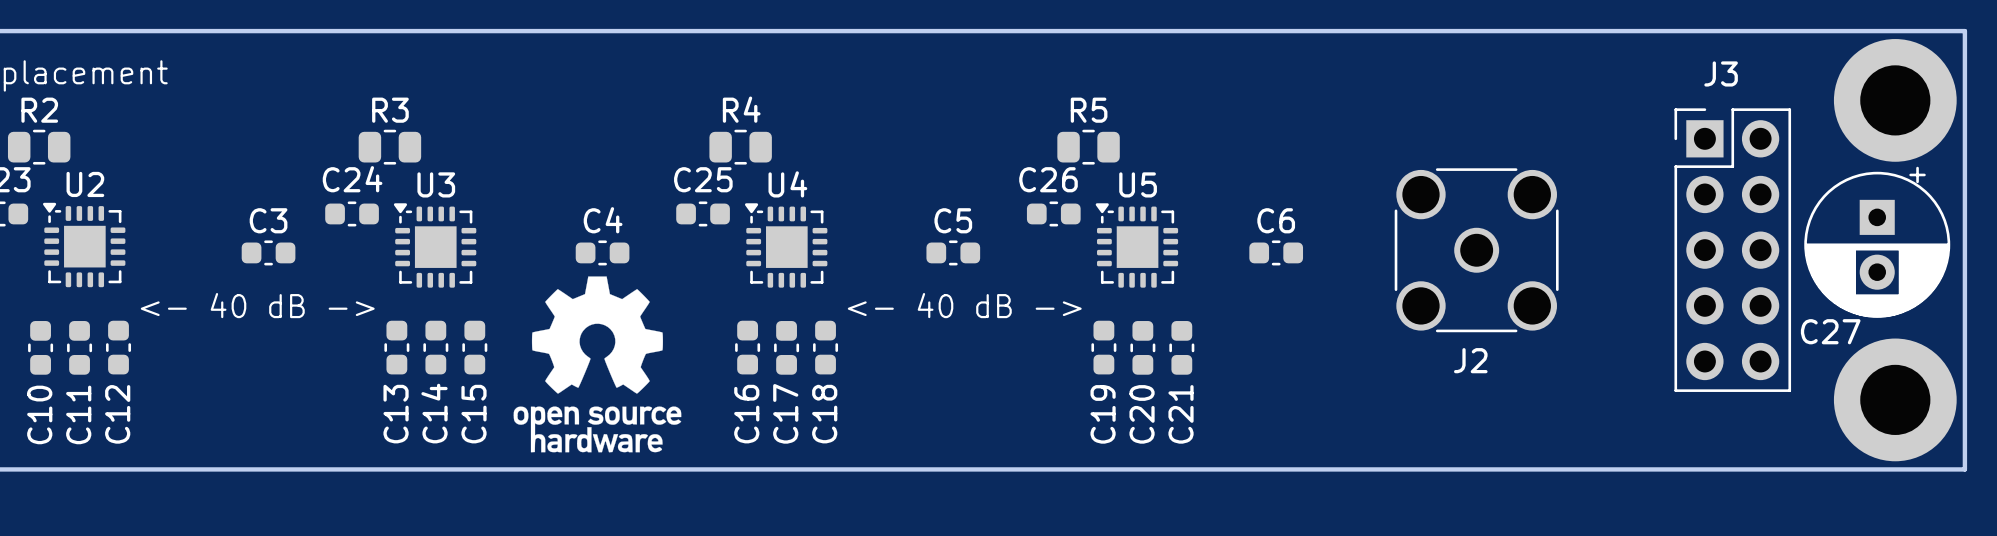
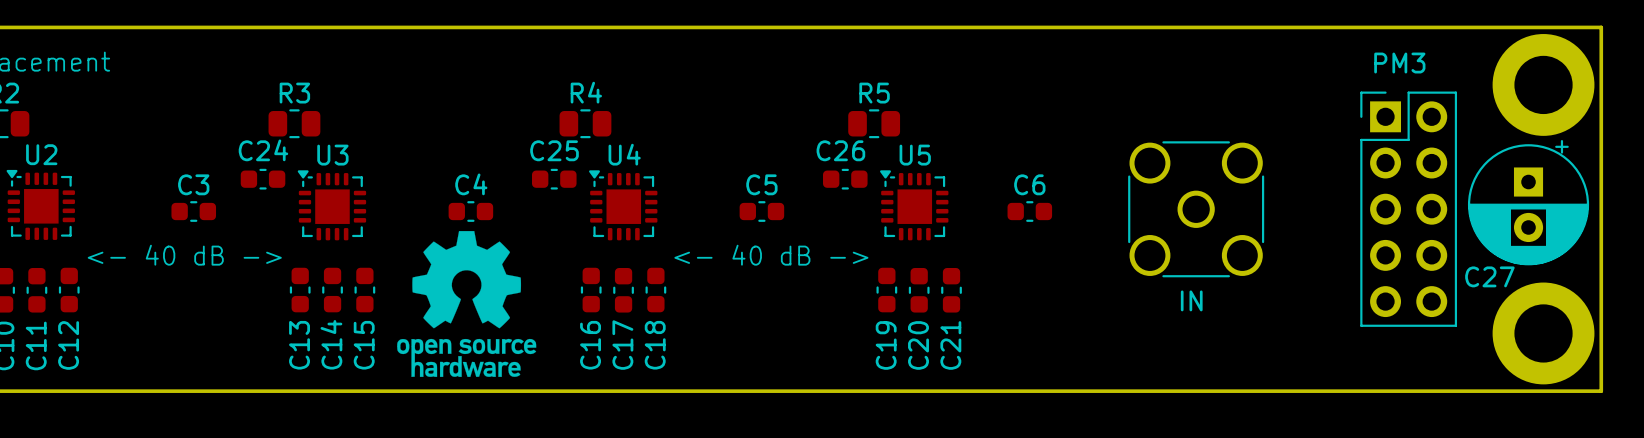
J3 name: J3 (1721, 73) -> PM3 (1399, 63)
J2 name: J2 (1470, 360) -> IN (1191, 300)

